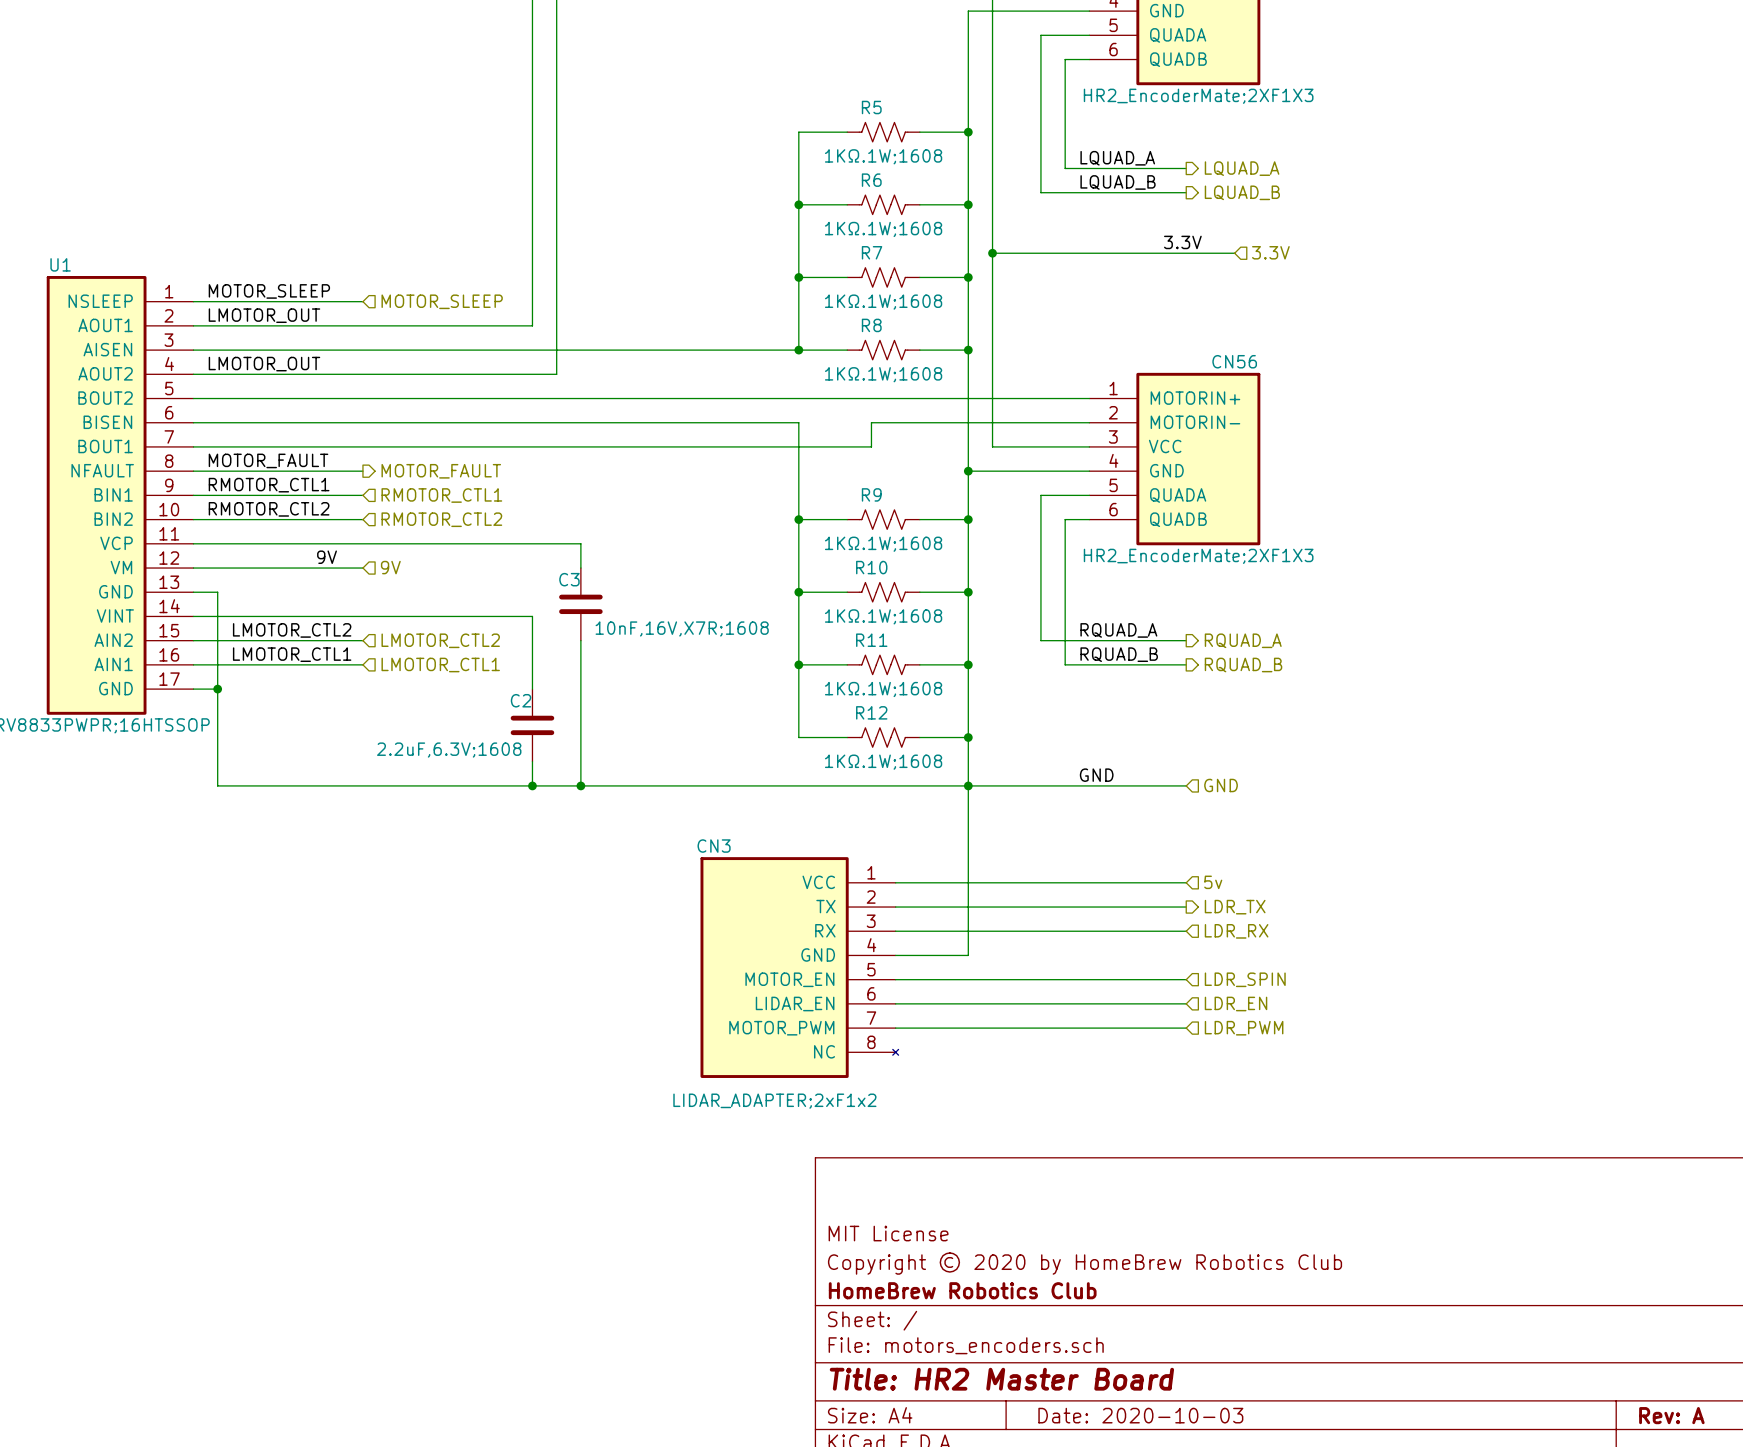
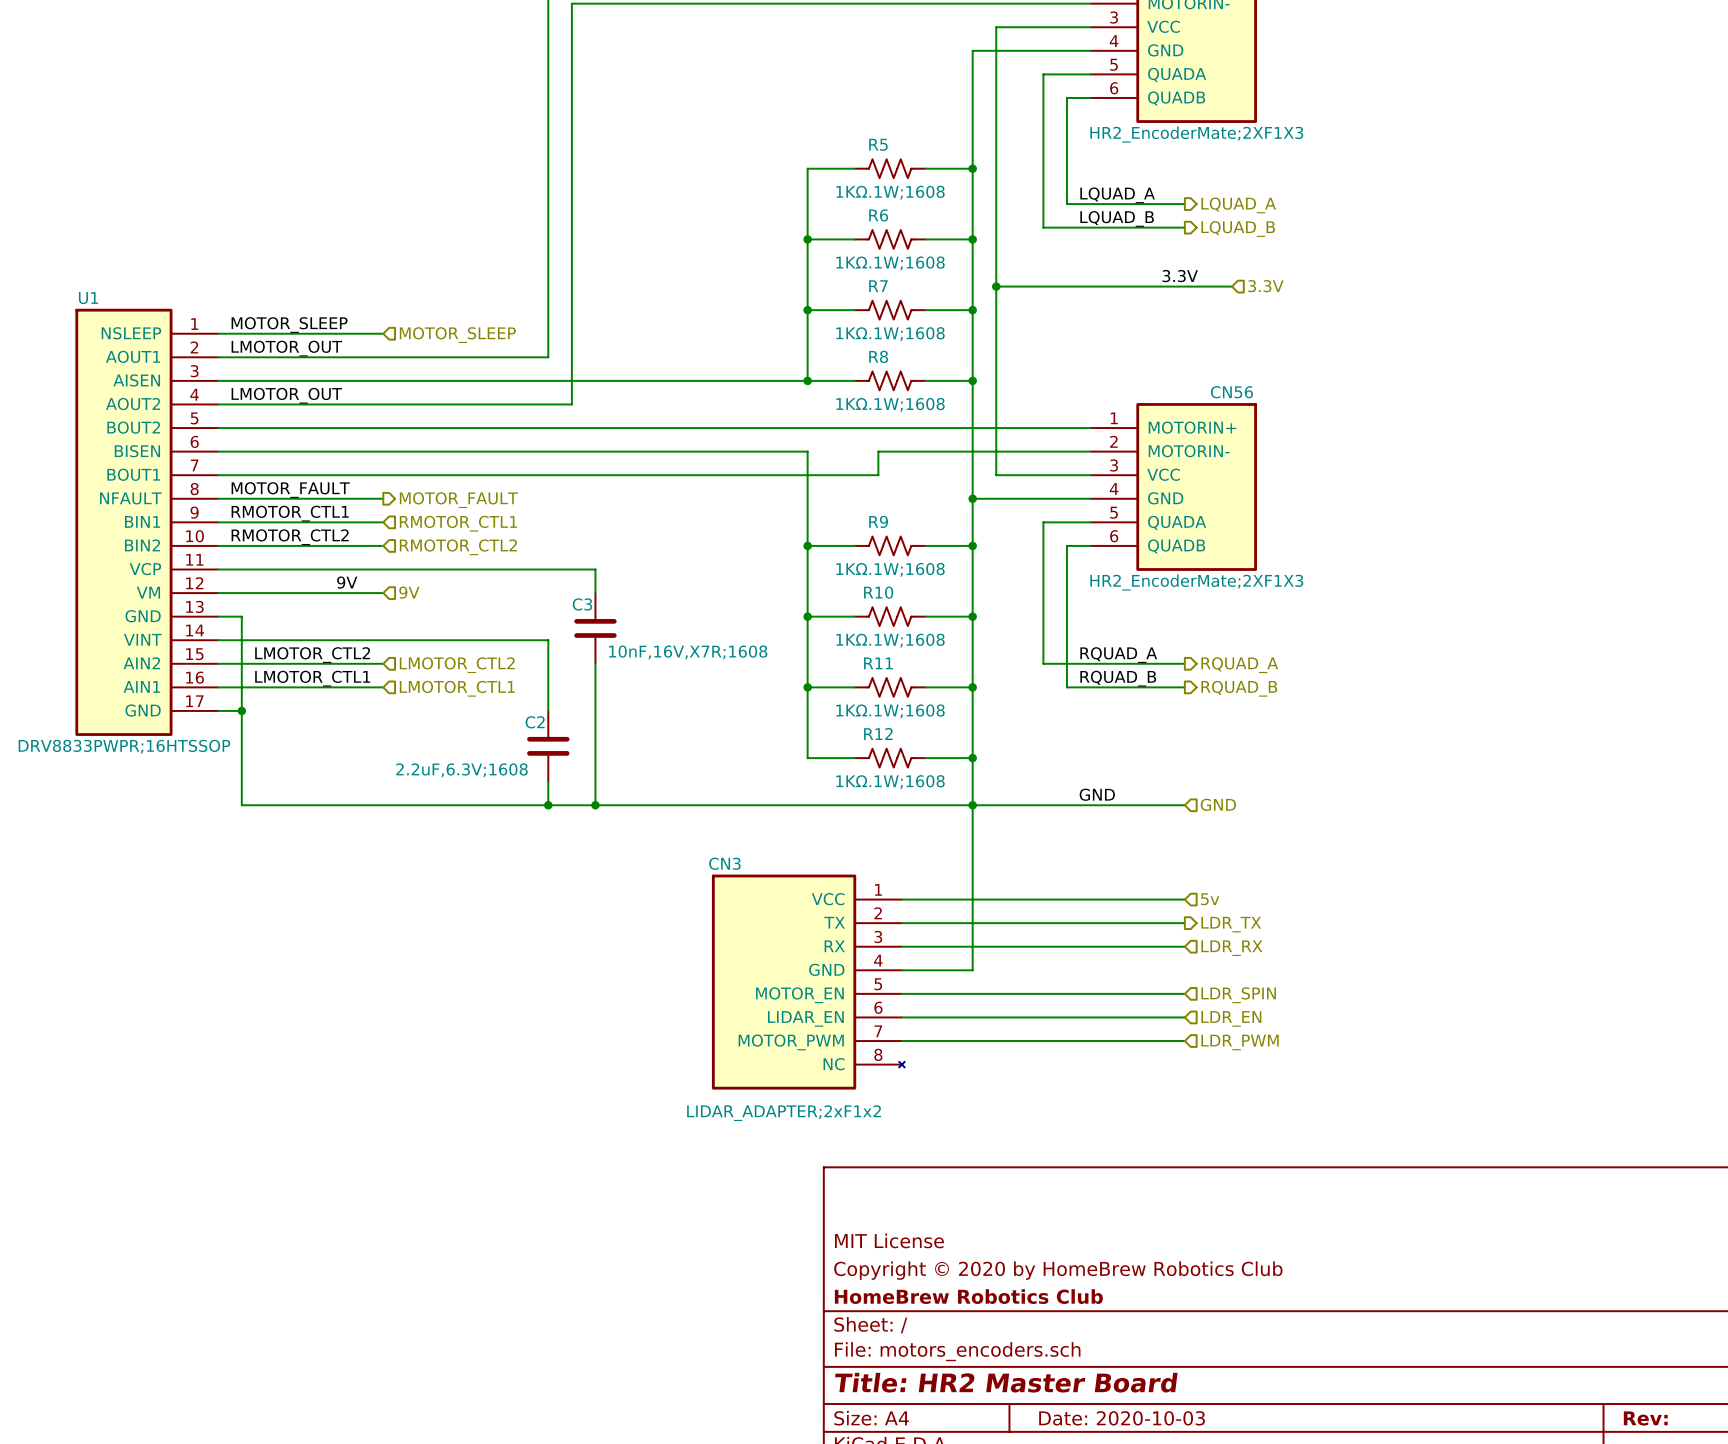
title block: Rev: A (1671, 1415) -> Rev: (1645, 1418)

